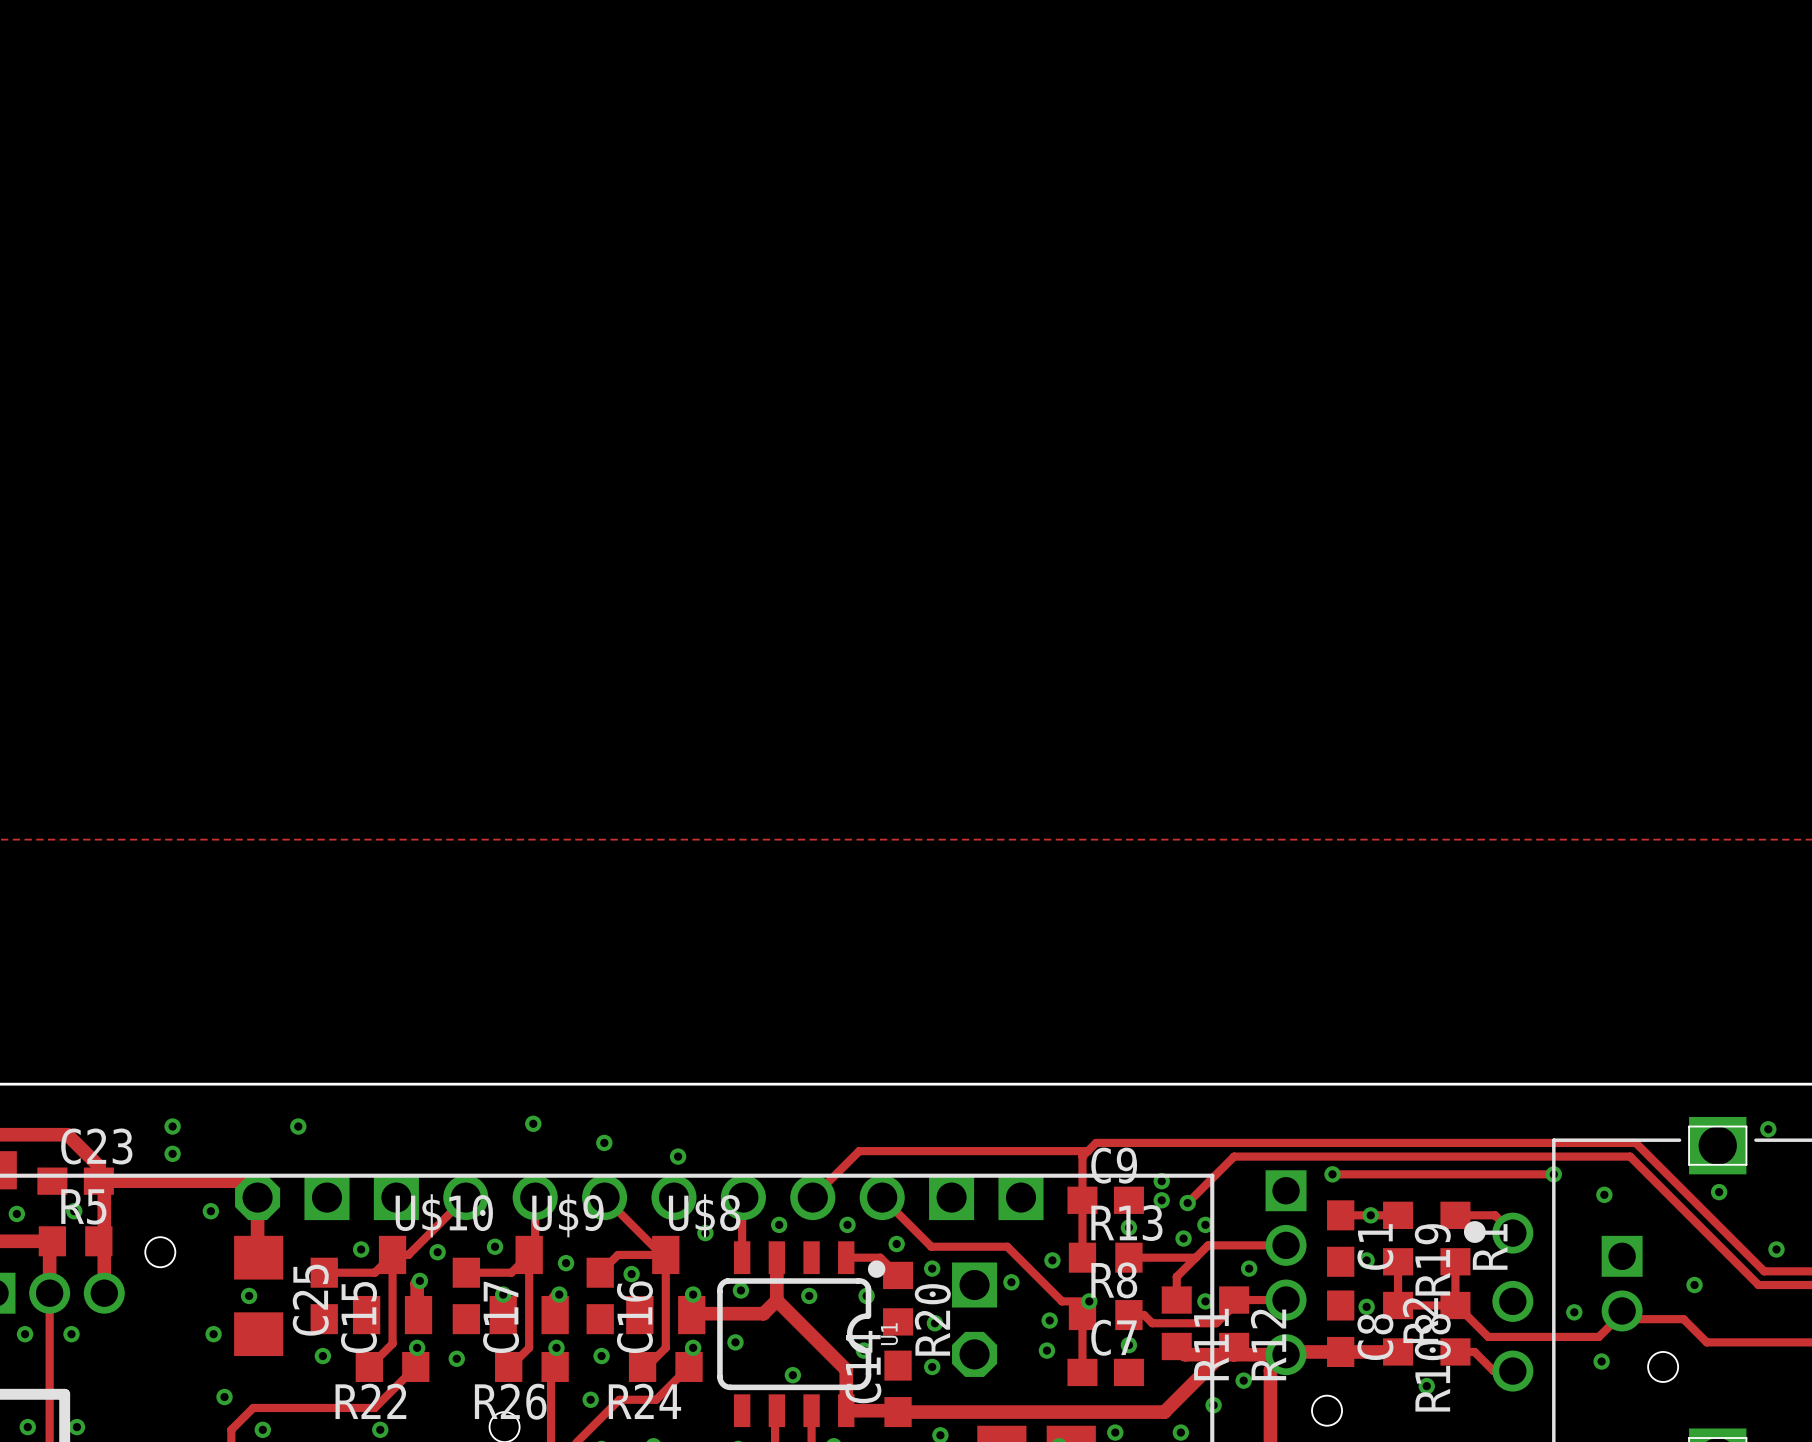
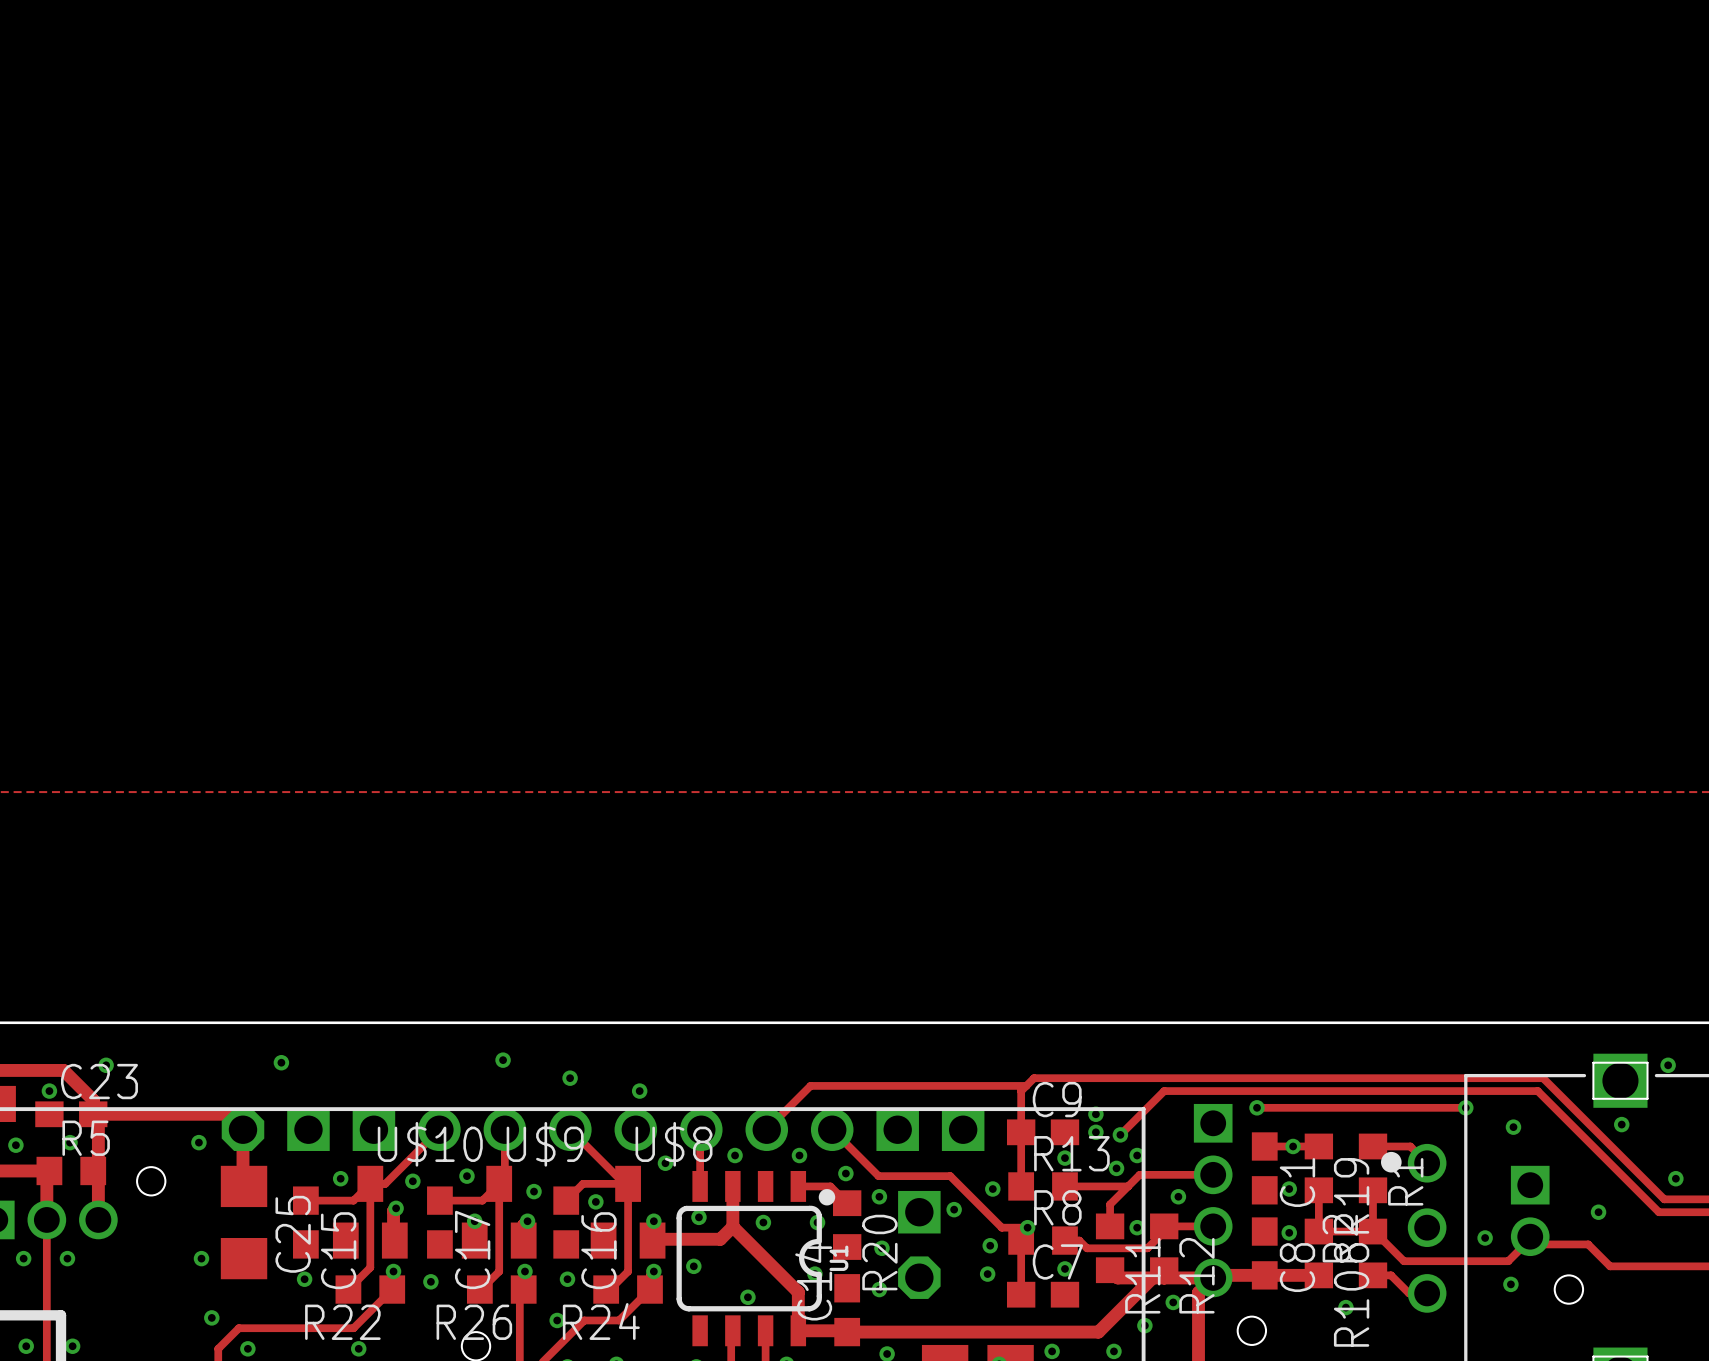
via: (172, 1126) -> none
via: none -> (106, 1065)
via: (172, 1153) -> none
via: none -> (49, 1091)
via: (249, 1295) -> none

